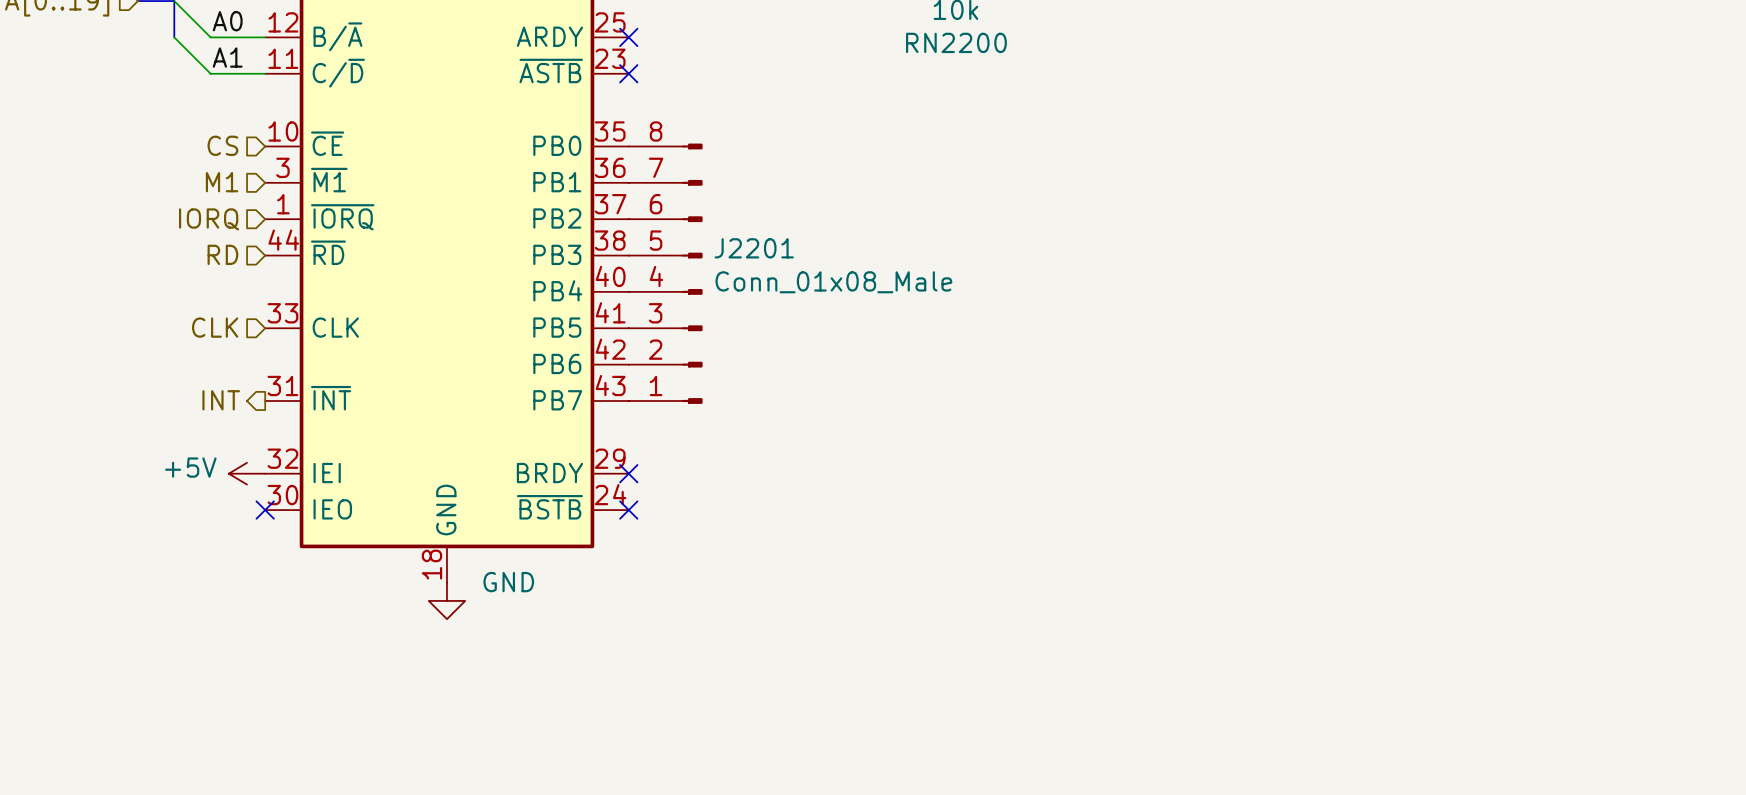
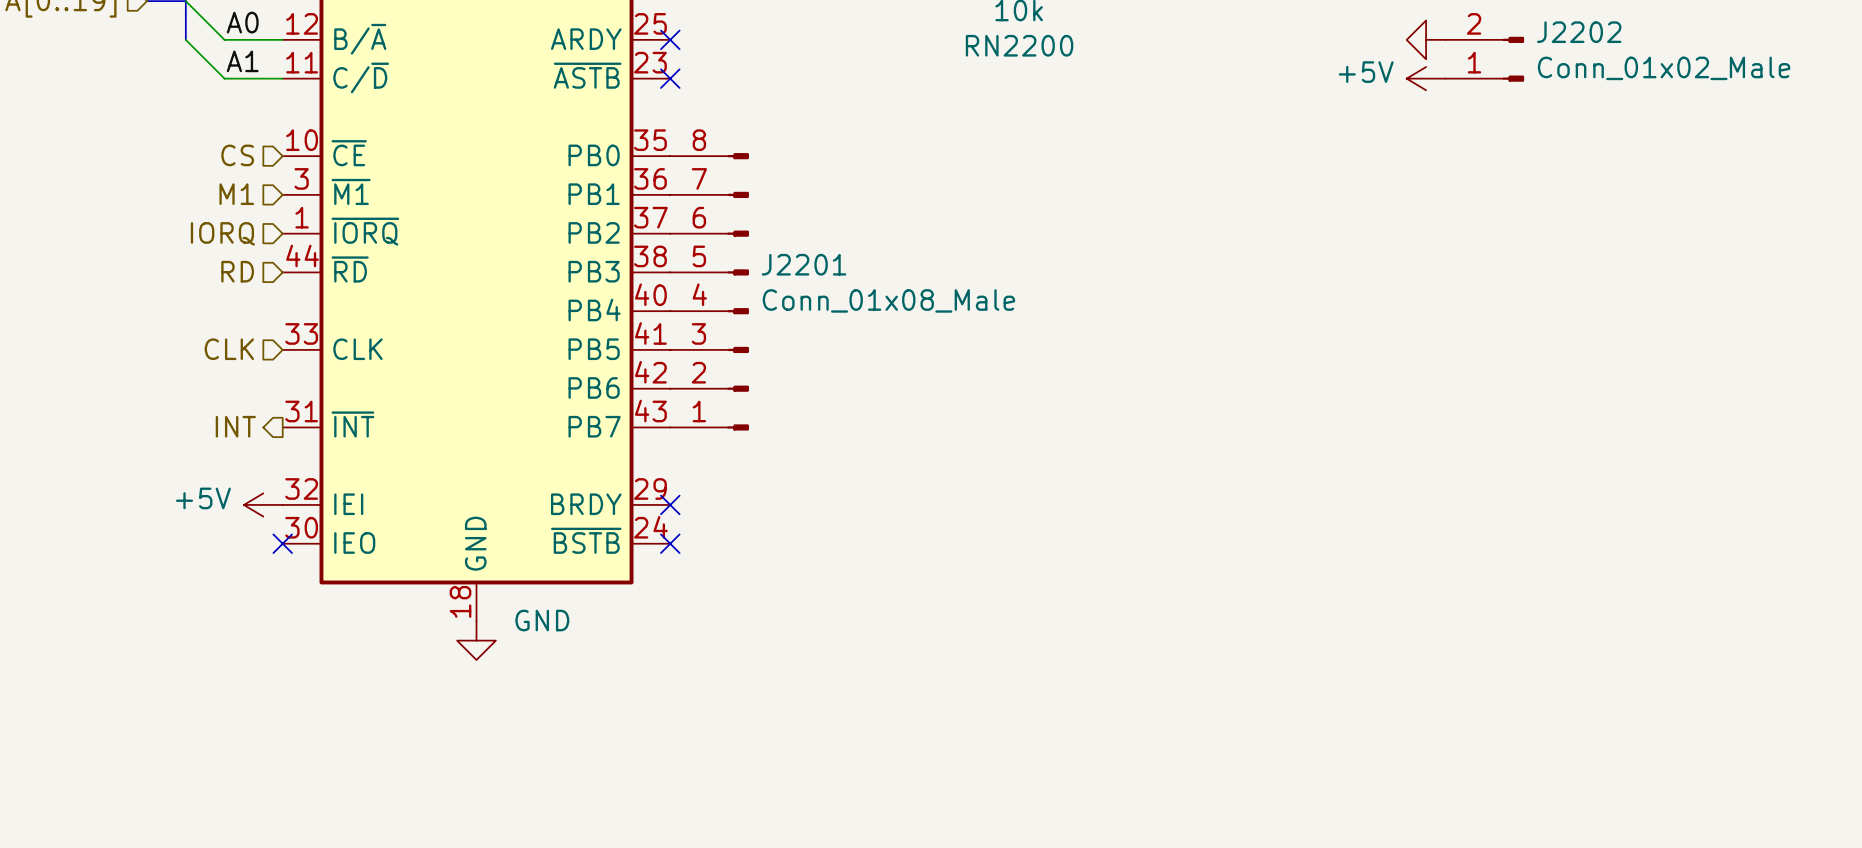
power symbol: none -> (1426, 39)
J2202: none -> Conn_01x02_Male (1484, 59)
power symbol: none -> +5V (1426, 78)

